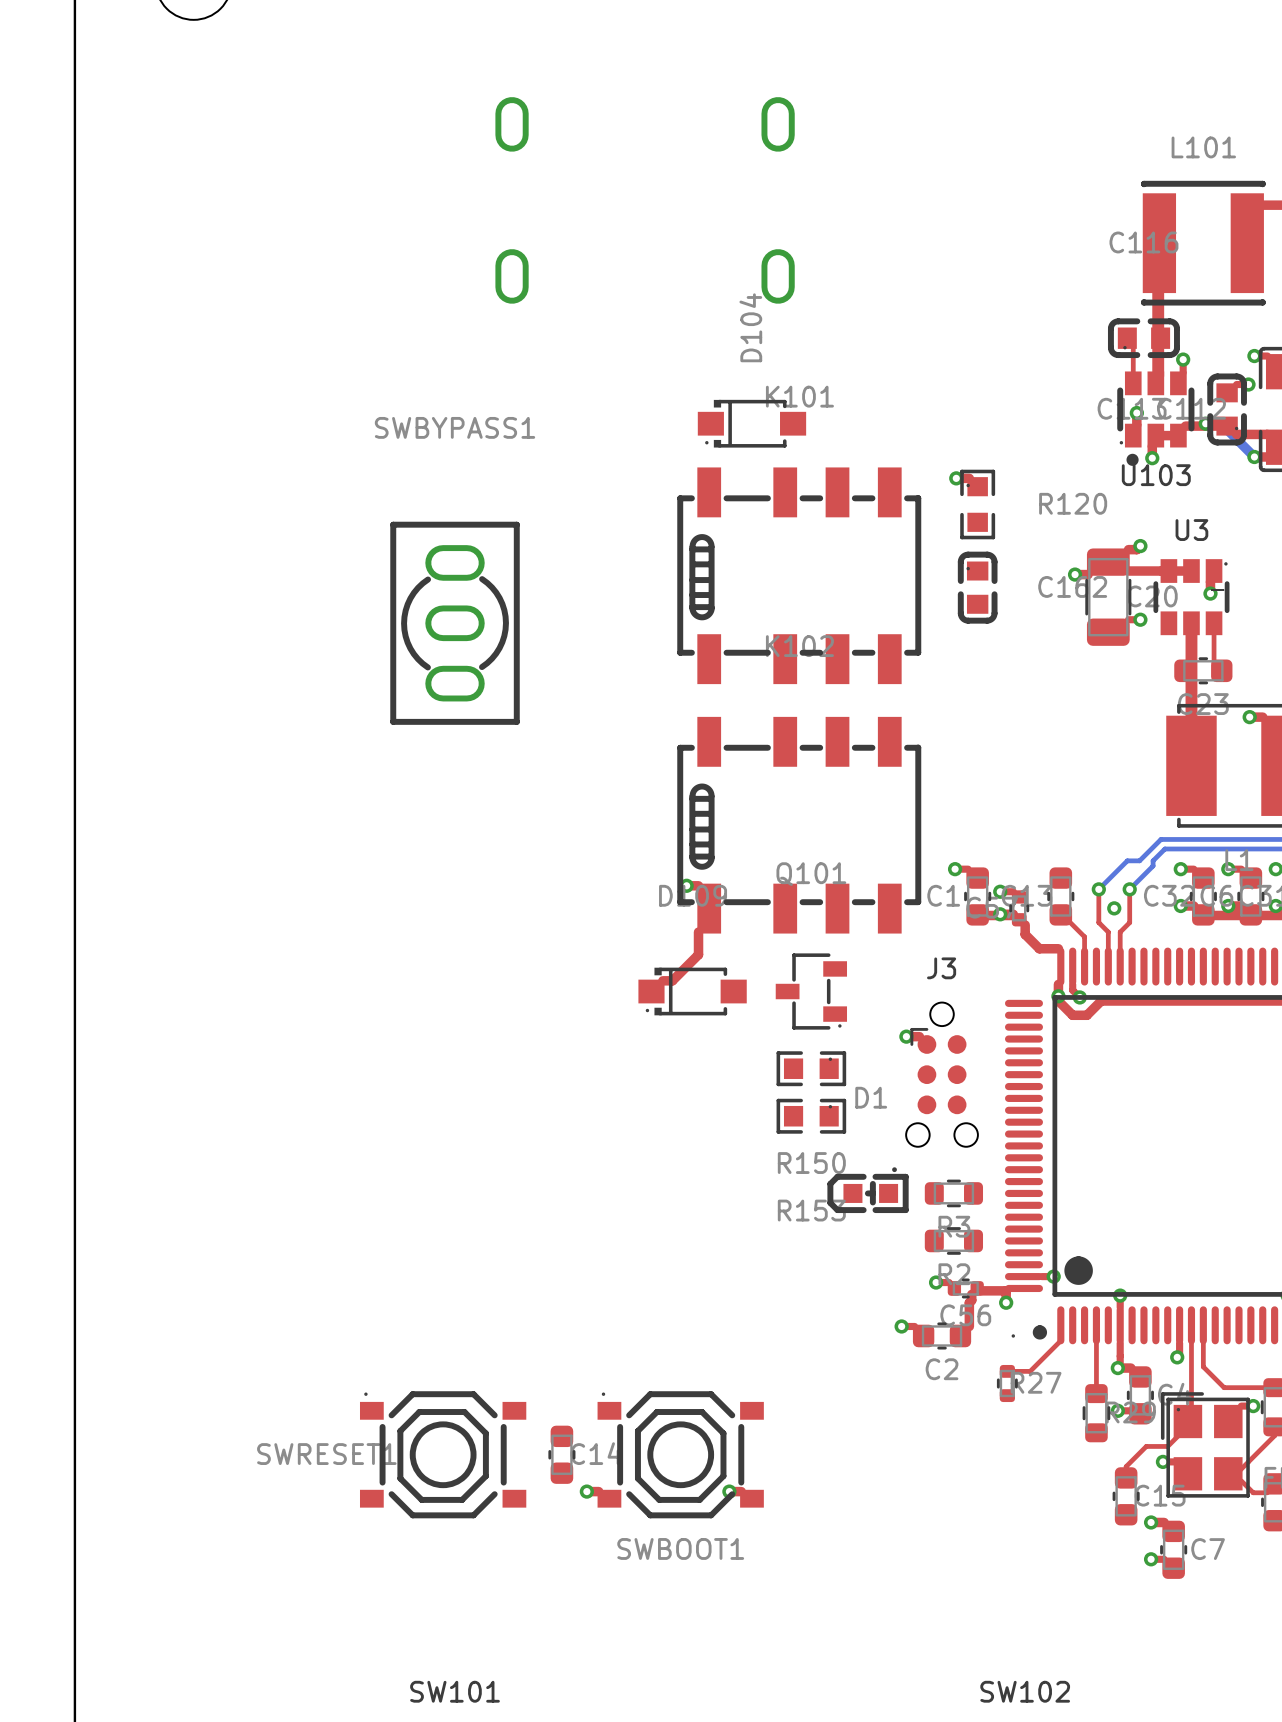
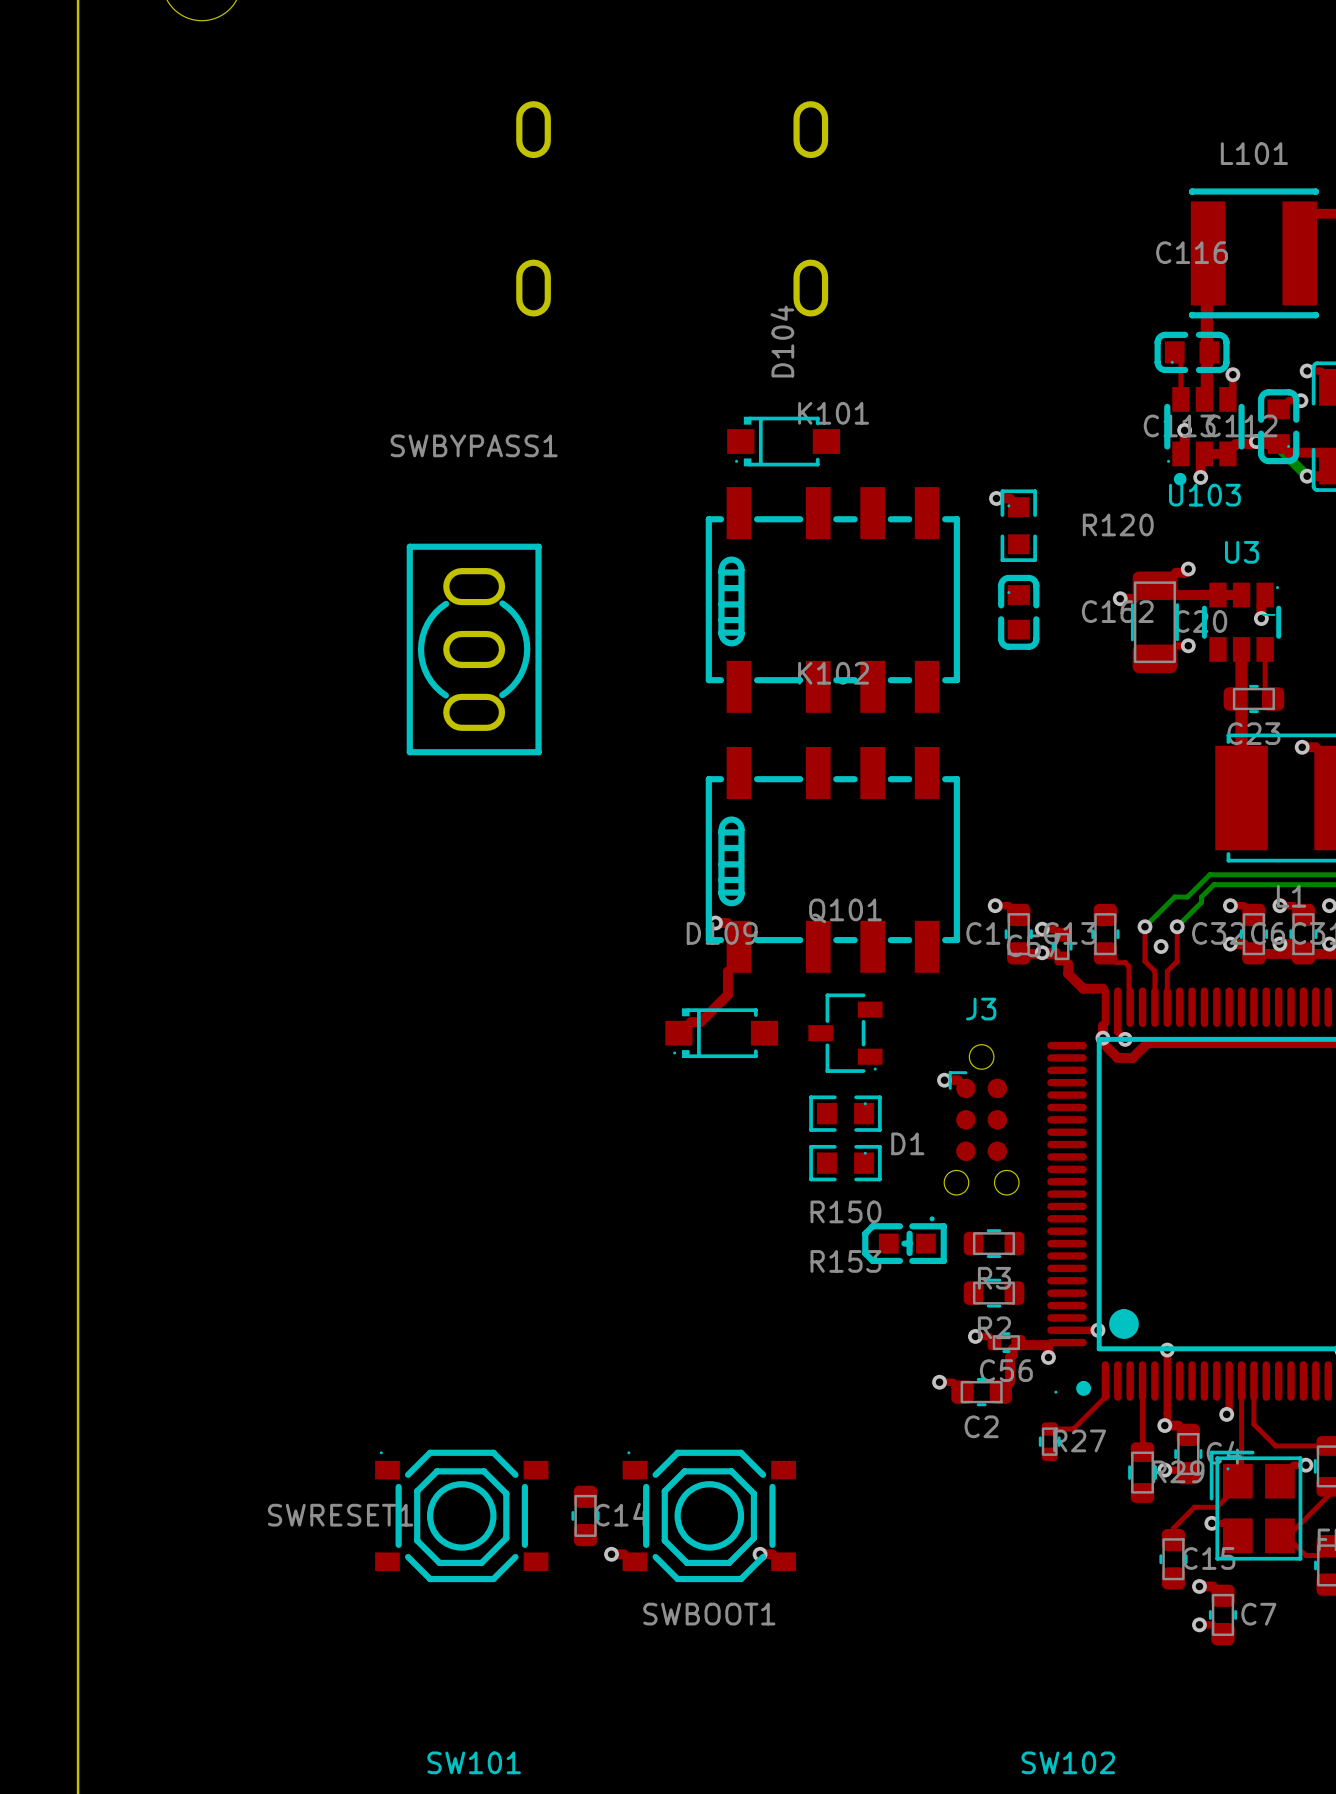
top track: (1067, 920) (1084, 936) (1084, 948) -> none
top track: none -> (1115, 962) (1125, 962) (1128, 966) (1128, 988)

